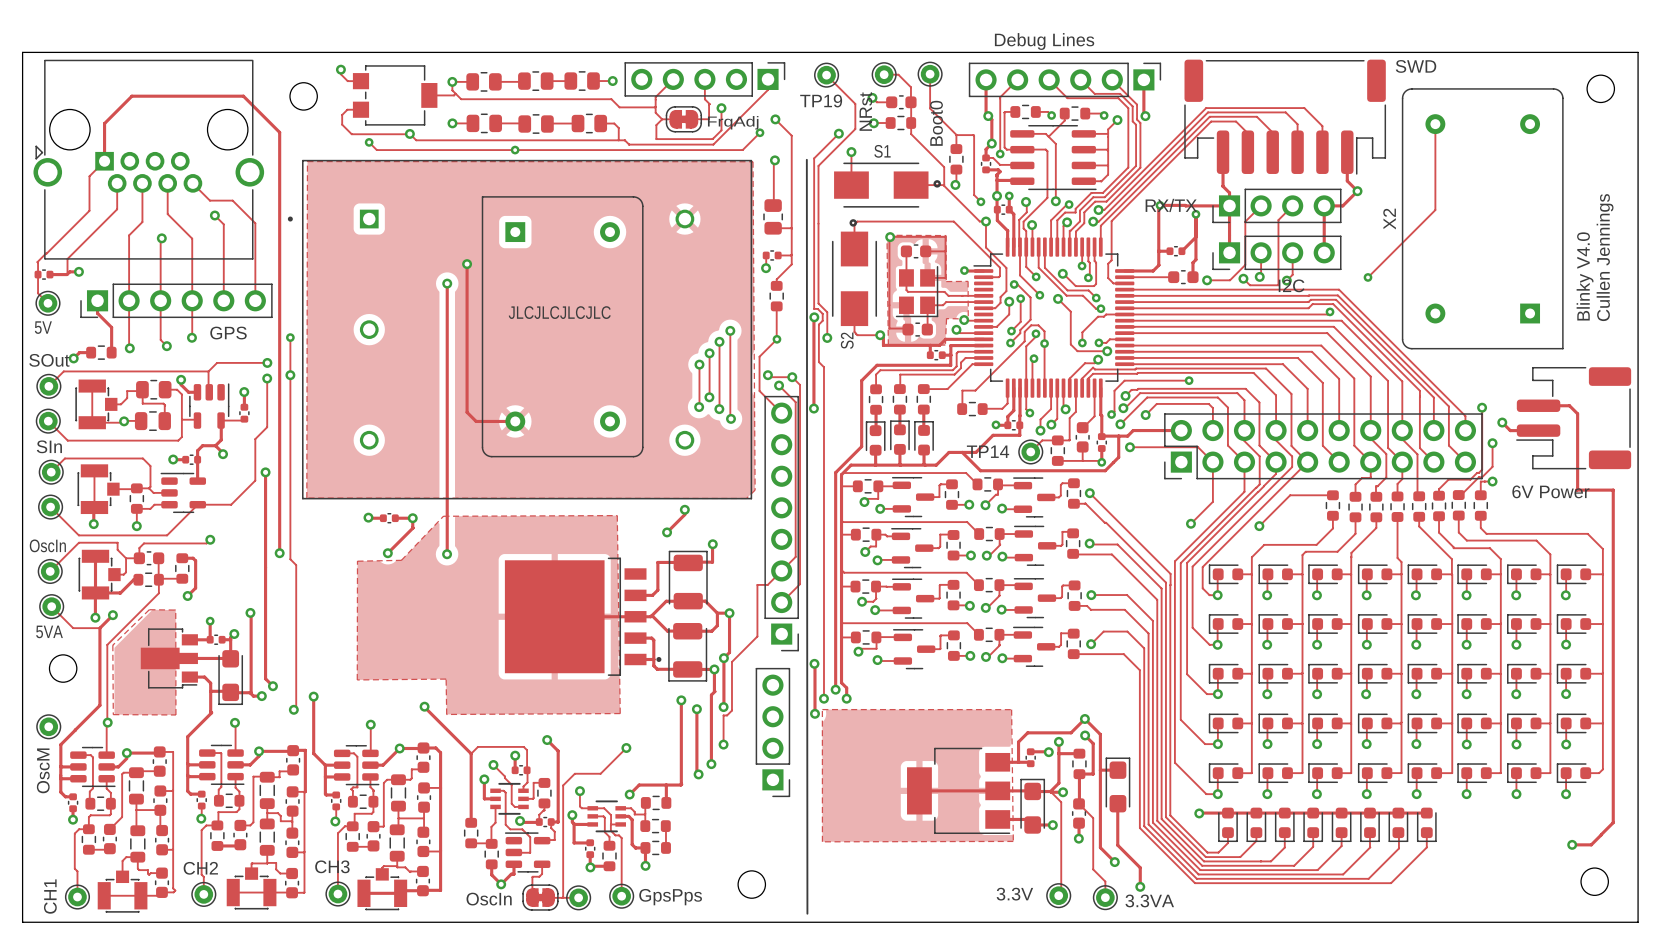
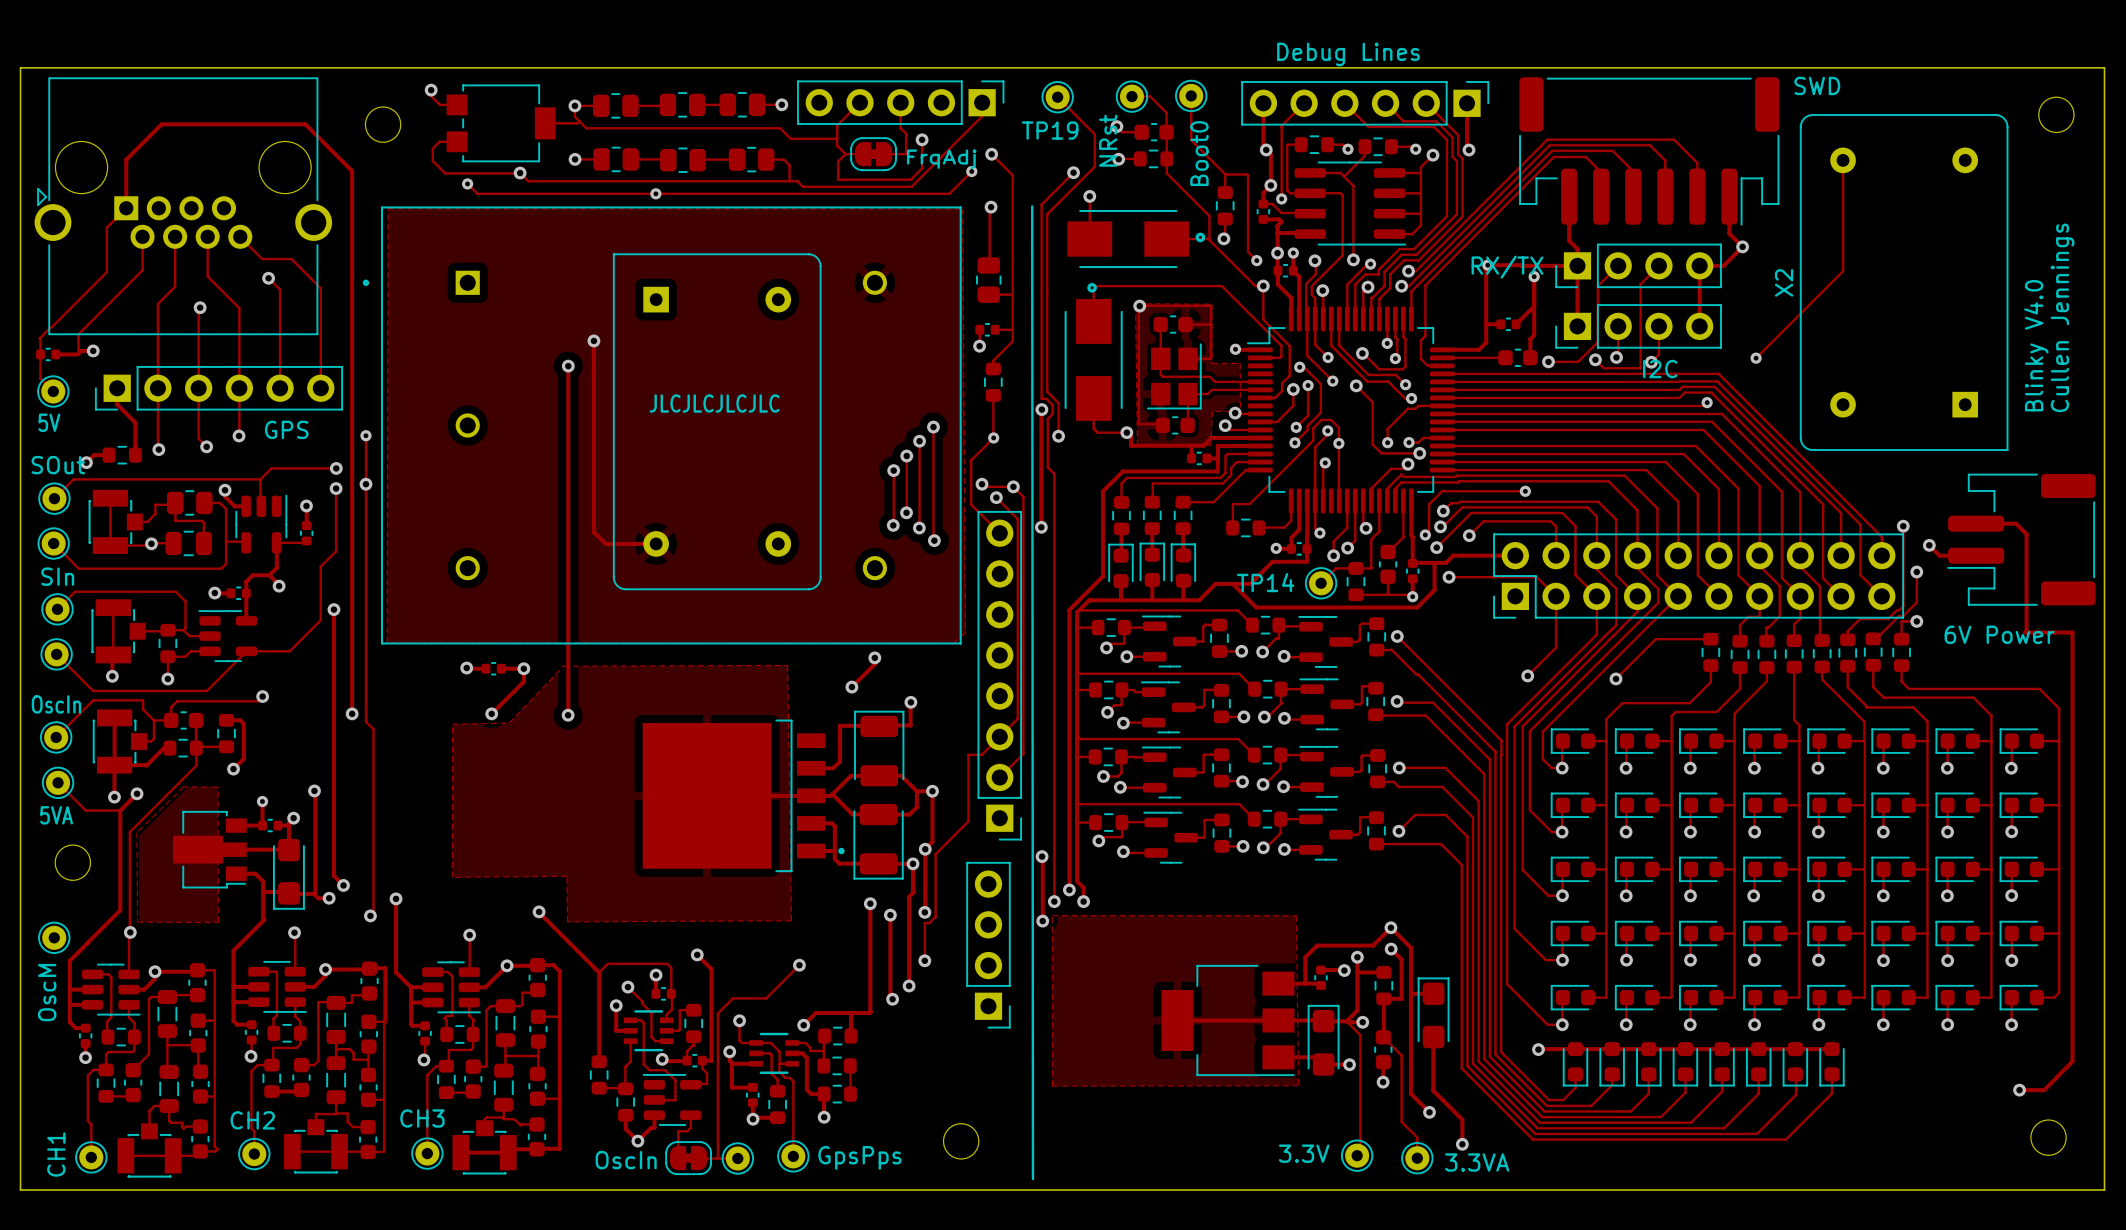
S1 name: S1 (882, 151) -> none
S2 name: S2 (847, 340) -> none

